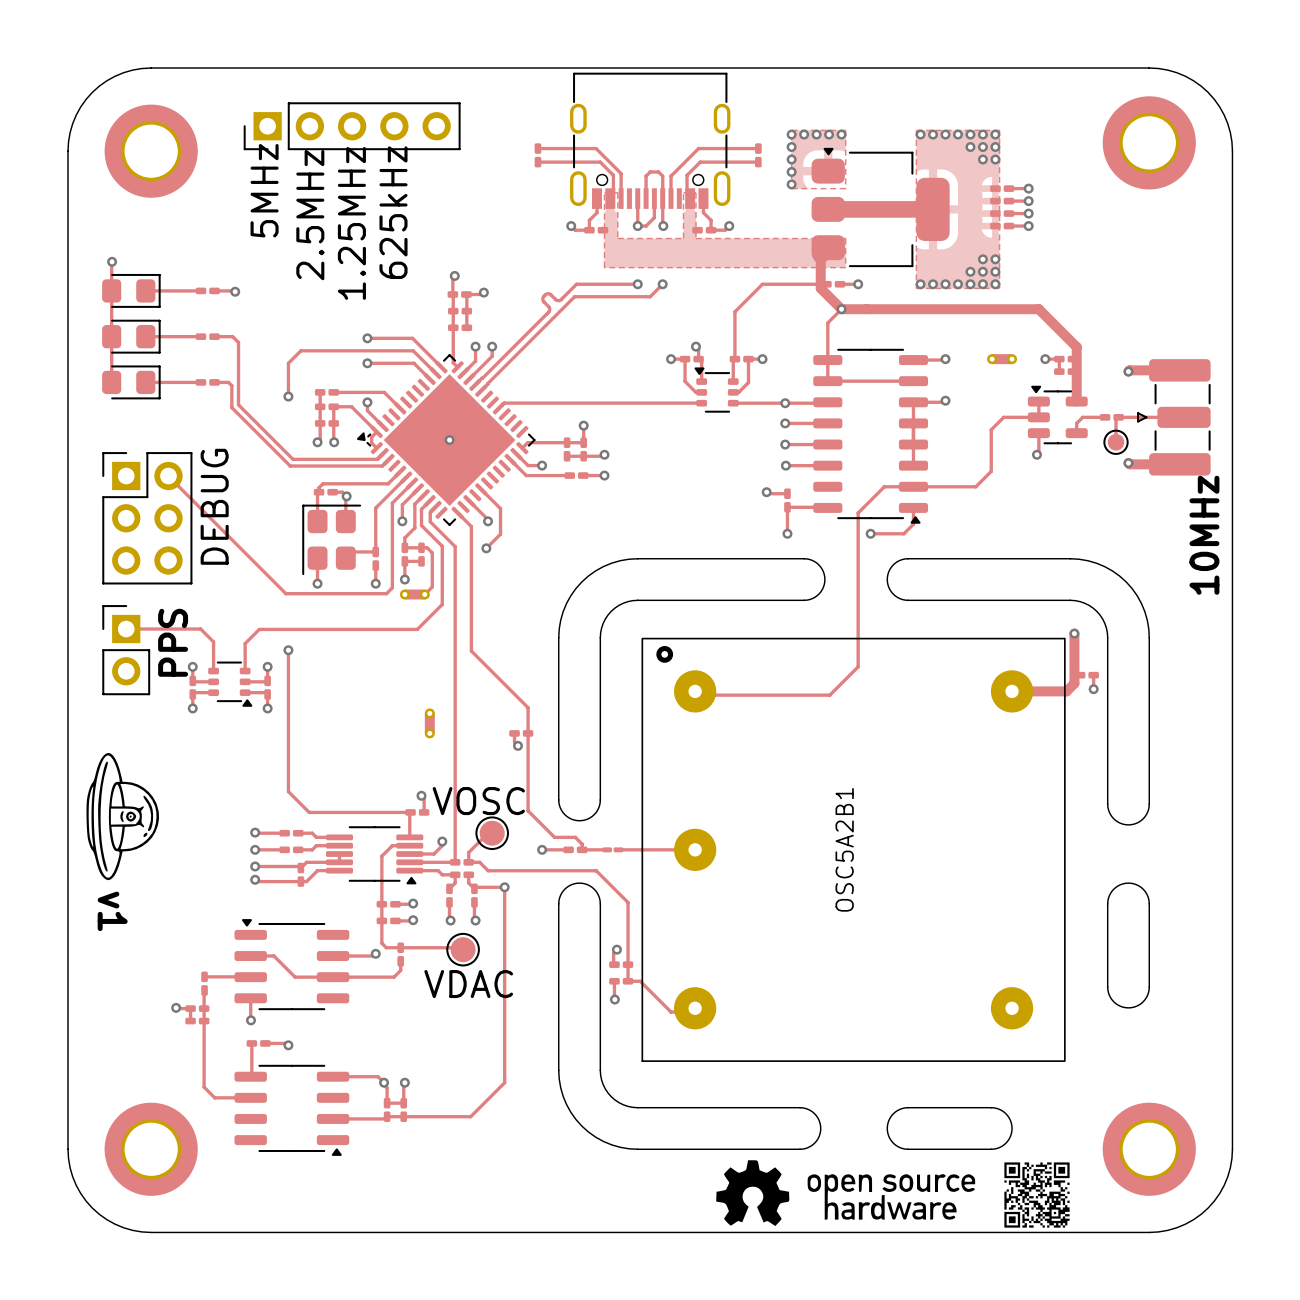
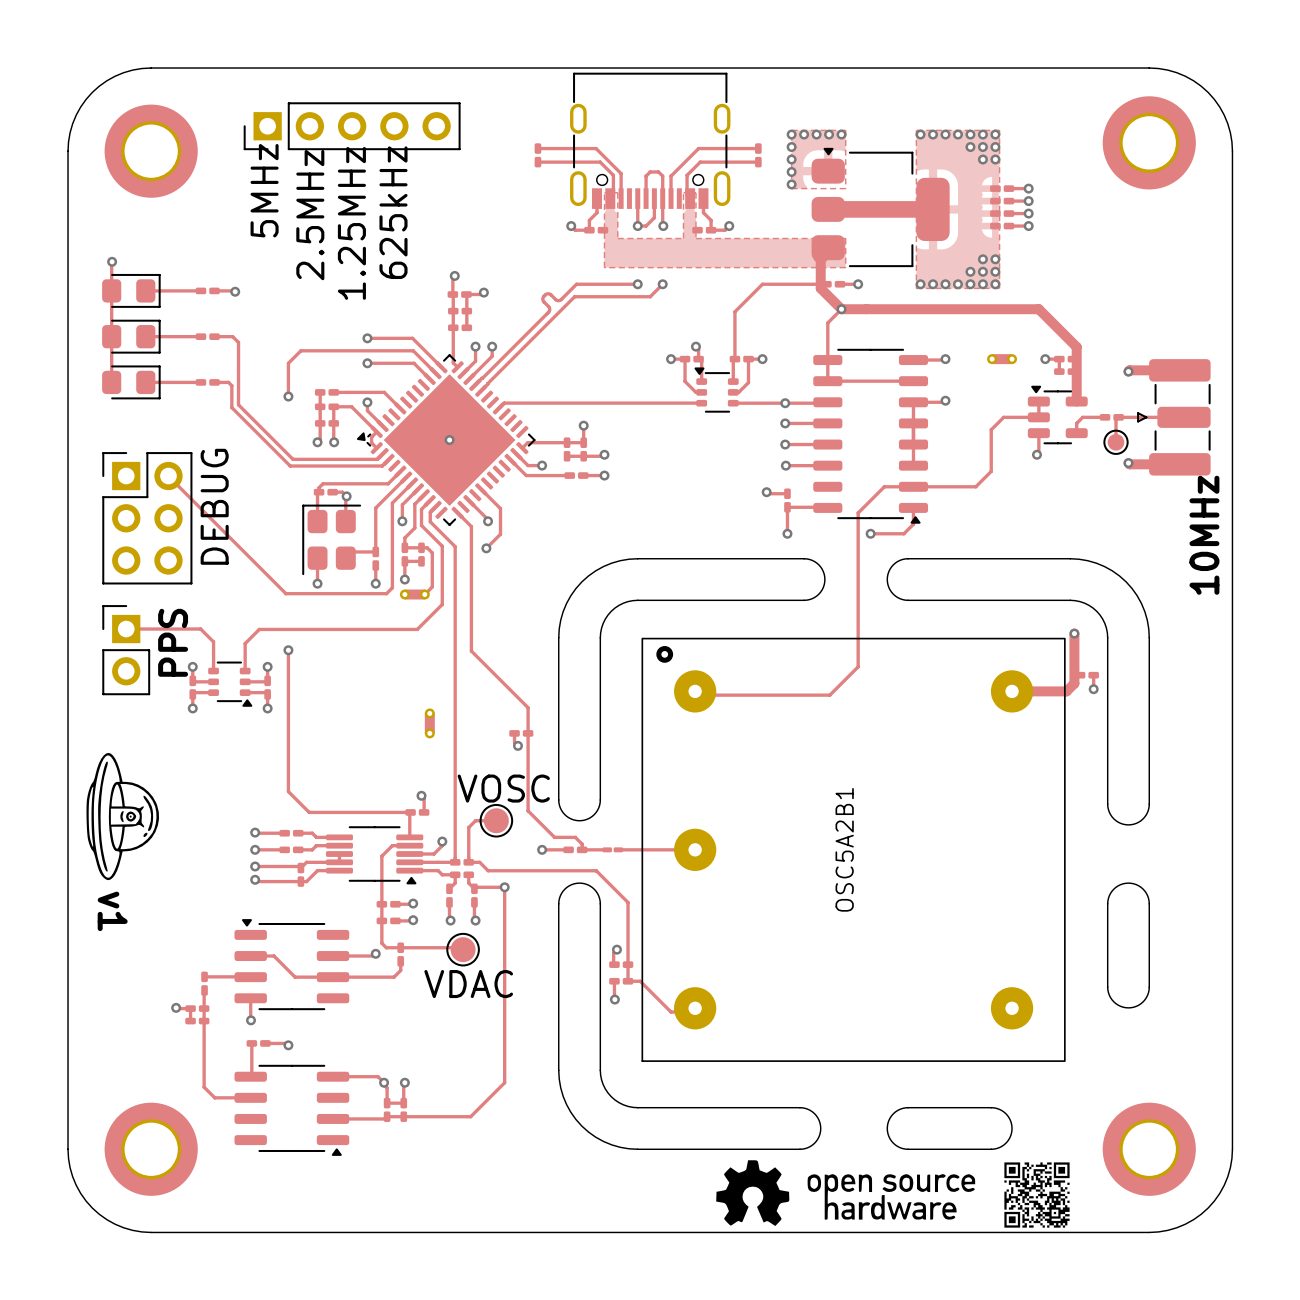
text position: VOSC (478, 801) -> VOSC (503, 788)
track: (488, 833) (468, 852) -> (496, 820) (475, 820) (468, 827) (468, 852)
part position: (492, 833) -> (496, 820)

